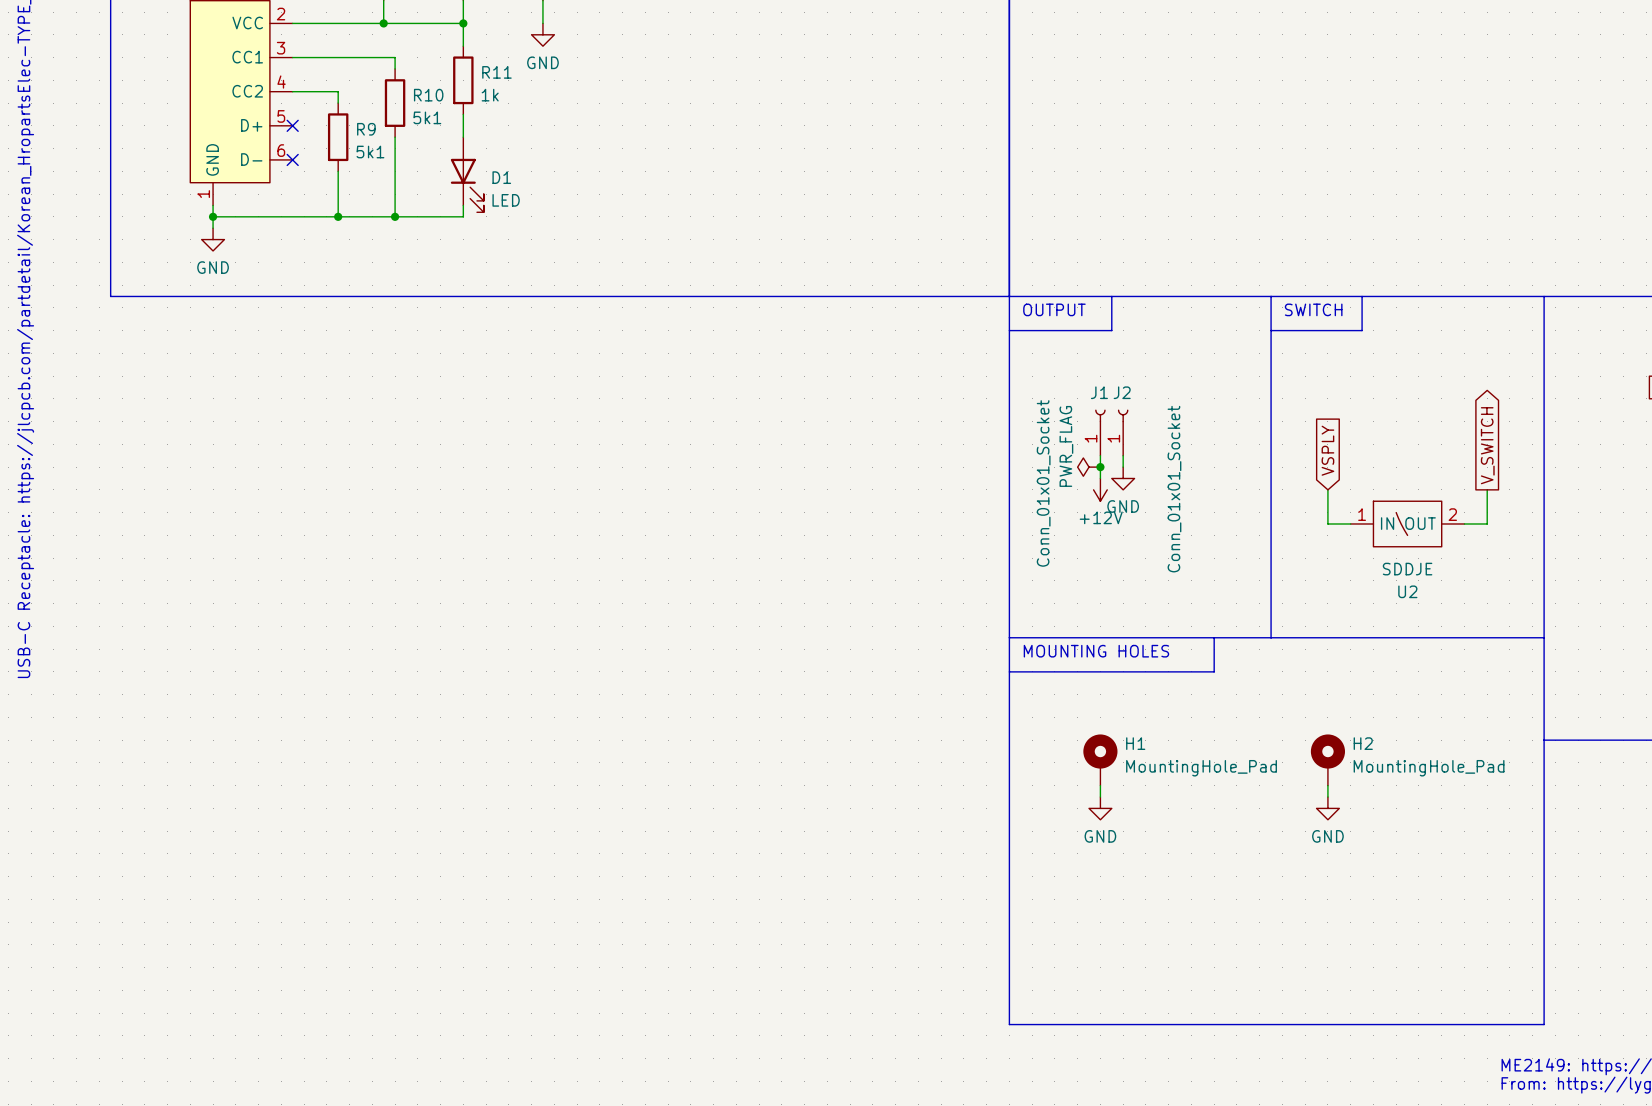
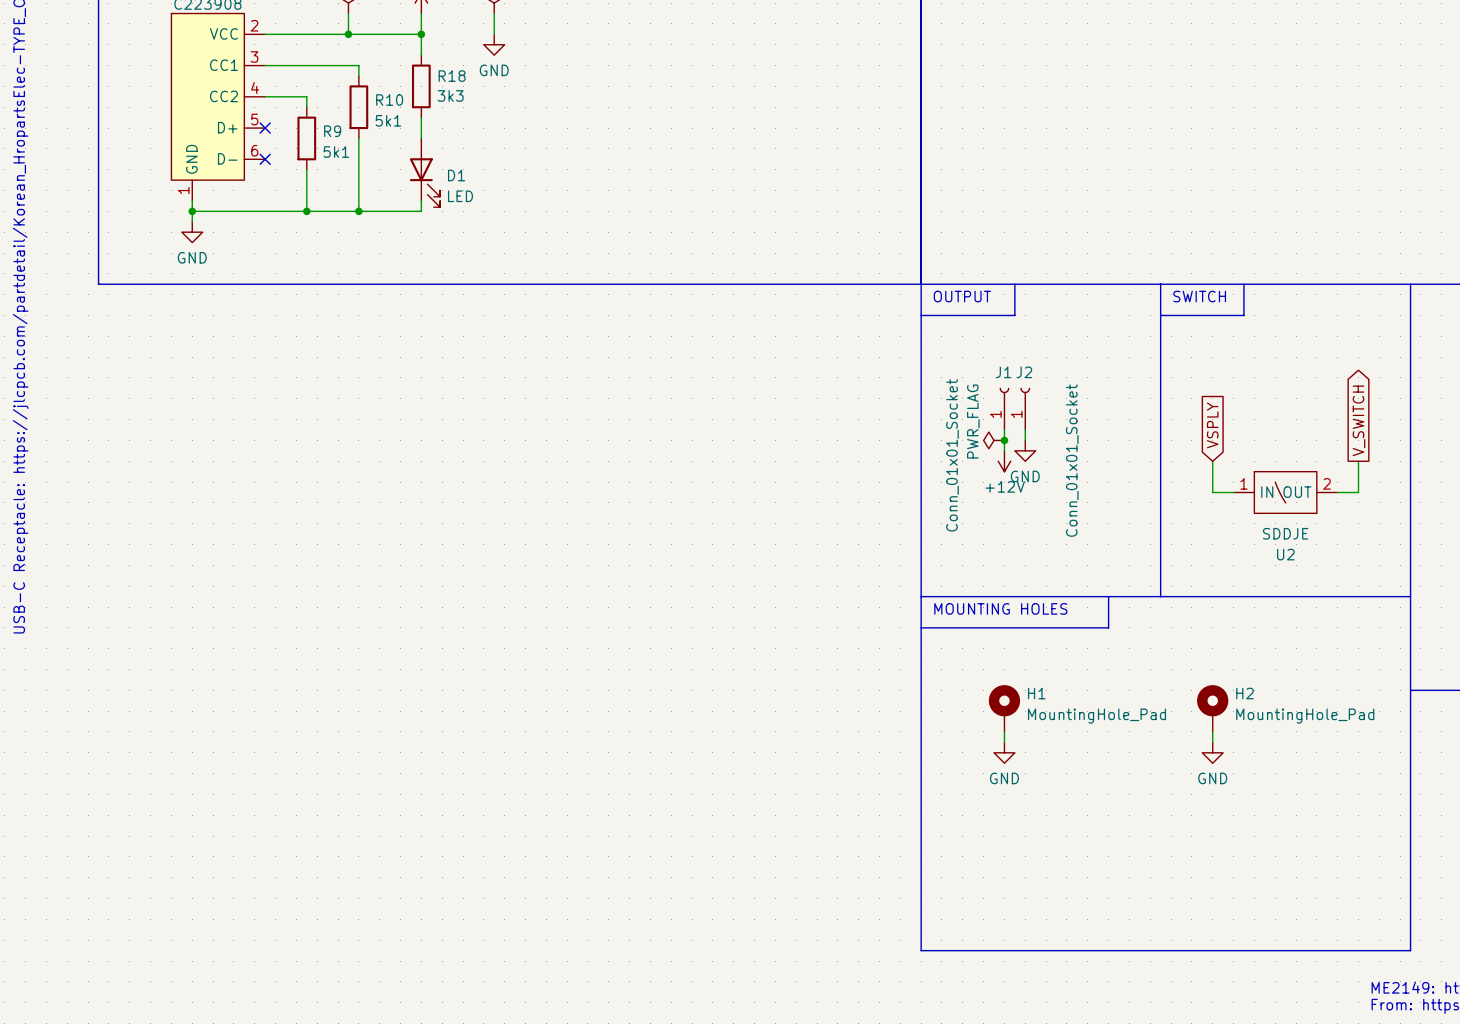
R11 name: R11 (496, 72) -> R18 (452, 76)
R11 value: 1k (490, 95) -> 3k3 (450, 95)

